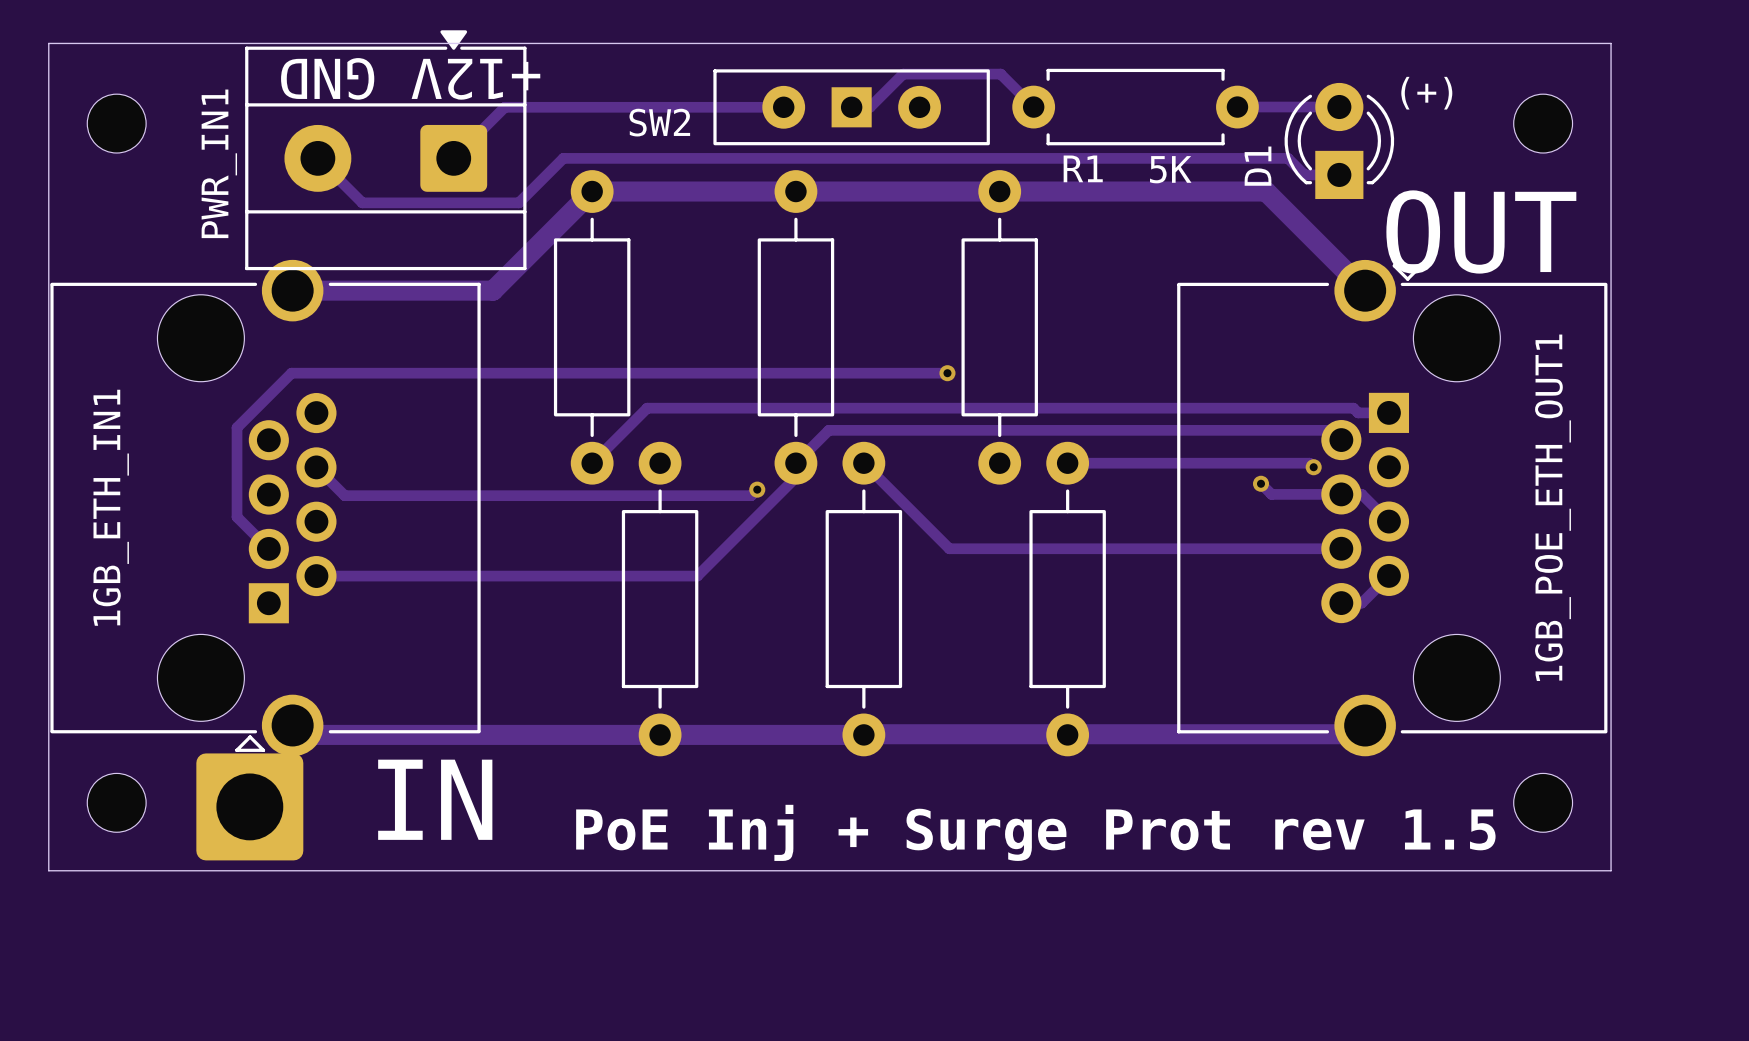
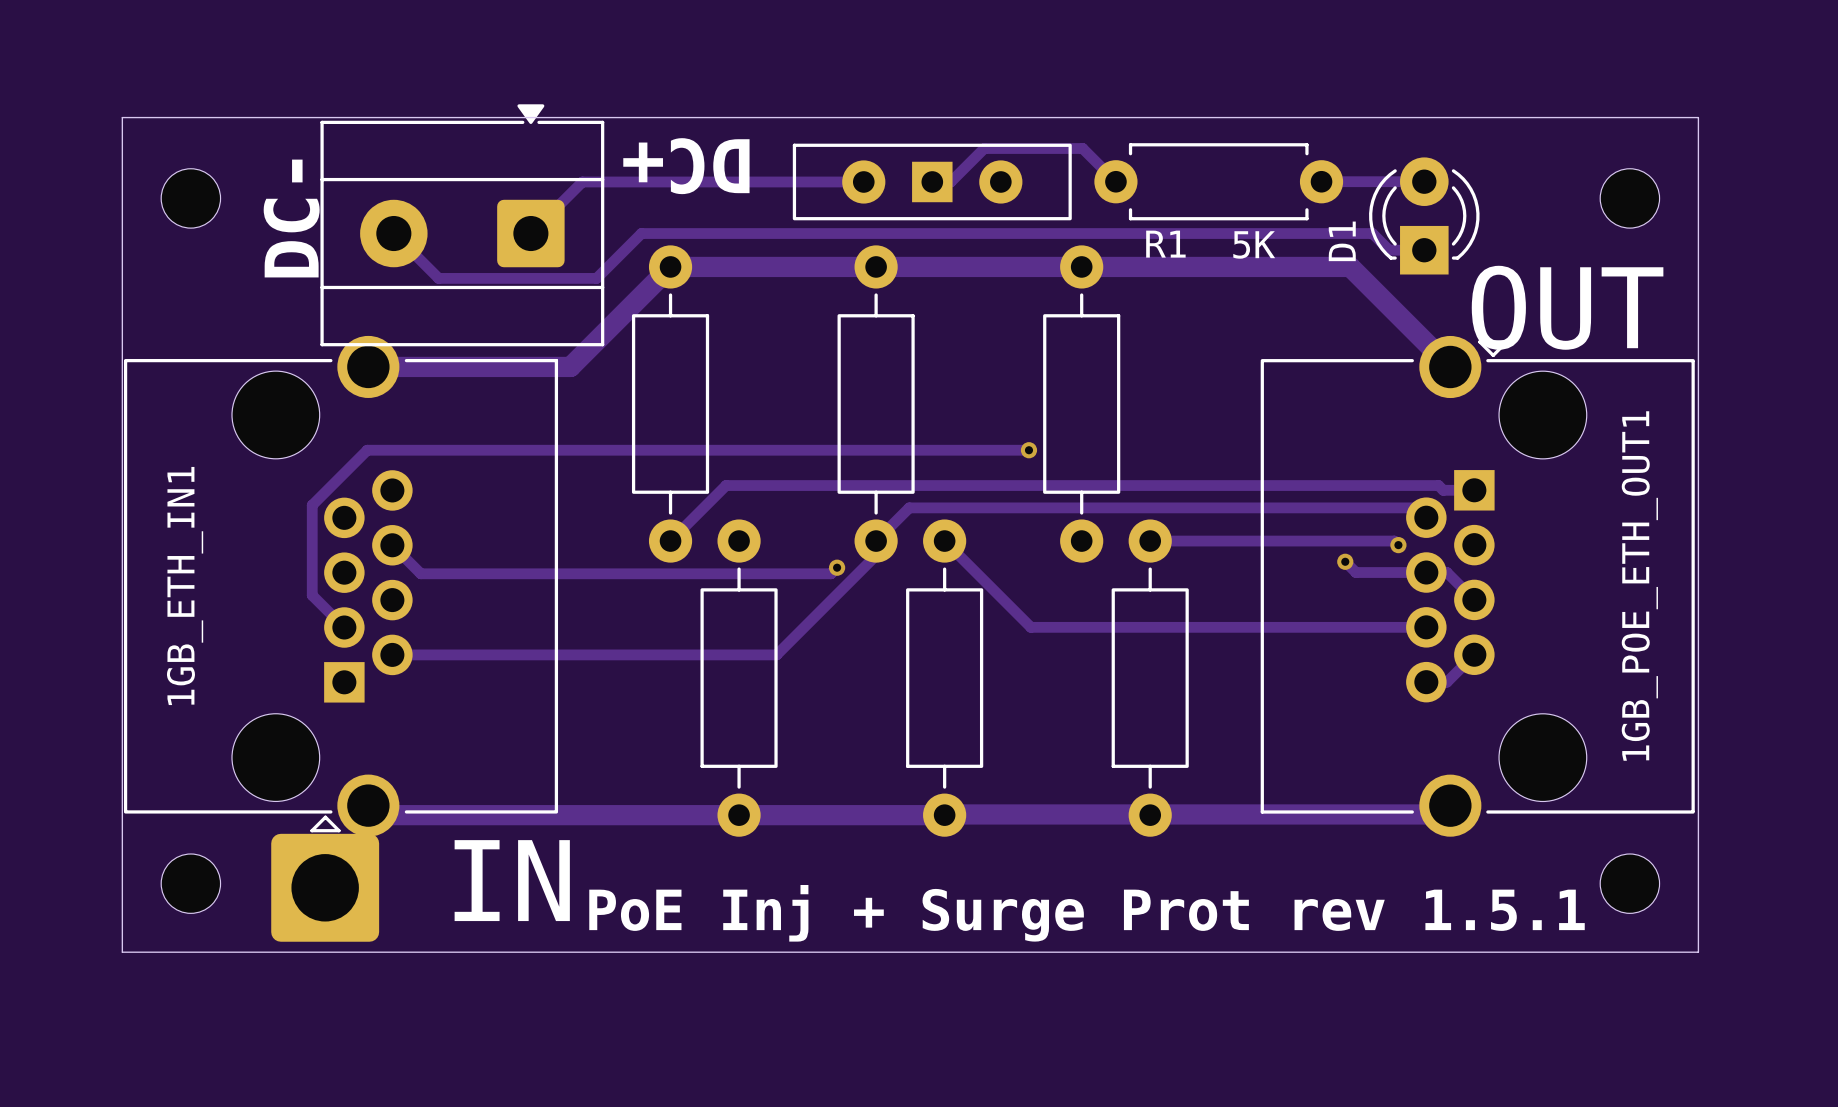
text: +12V GND (410, 78) -> none
text: none -> DC+ (686, 166)
text: (+) (1426, 93) -> none
SW2 name: SW2 (659, 122) -> none
text: none -> DC- (291, 218)
PWR_IN1 name: PWR_IN1 (219, 163) -> none
text: PoE Inj + Surge Prot rev 1.5 (1035, 832) -> PoE Inj + Surge Prot rev 1.5.1 (1087, 913)

